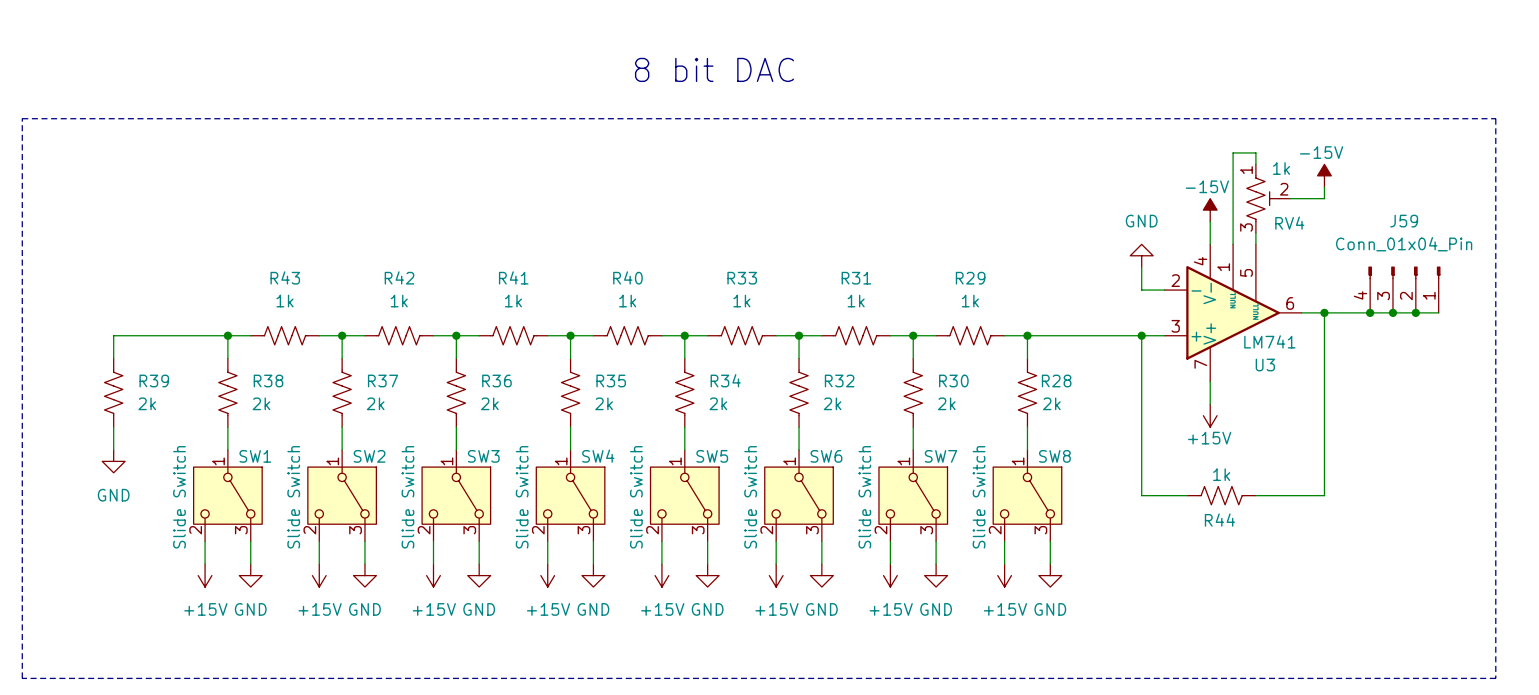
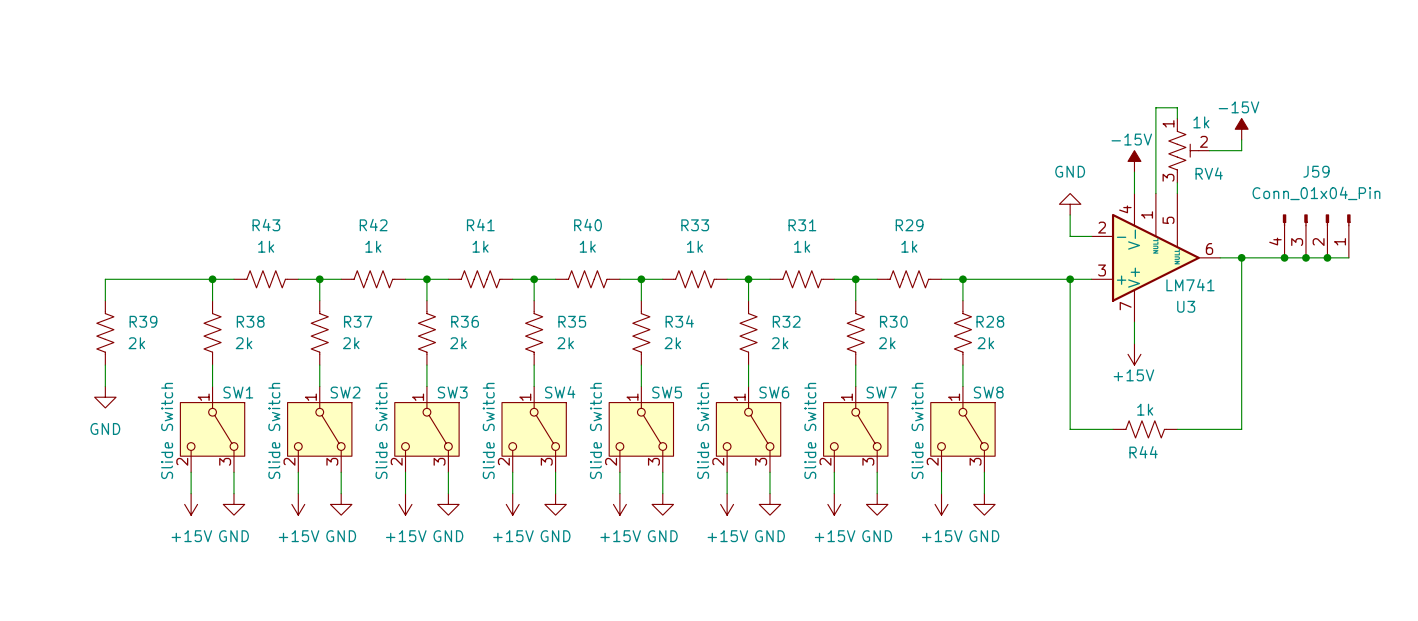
text: 8 bit DAC (714, 69) -> none
line: (22, 118) (1495, 118) (1495, 678) (22, 678) (22, 118) -> none

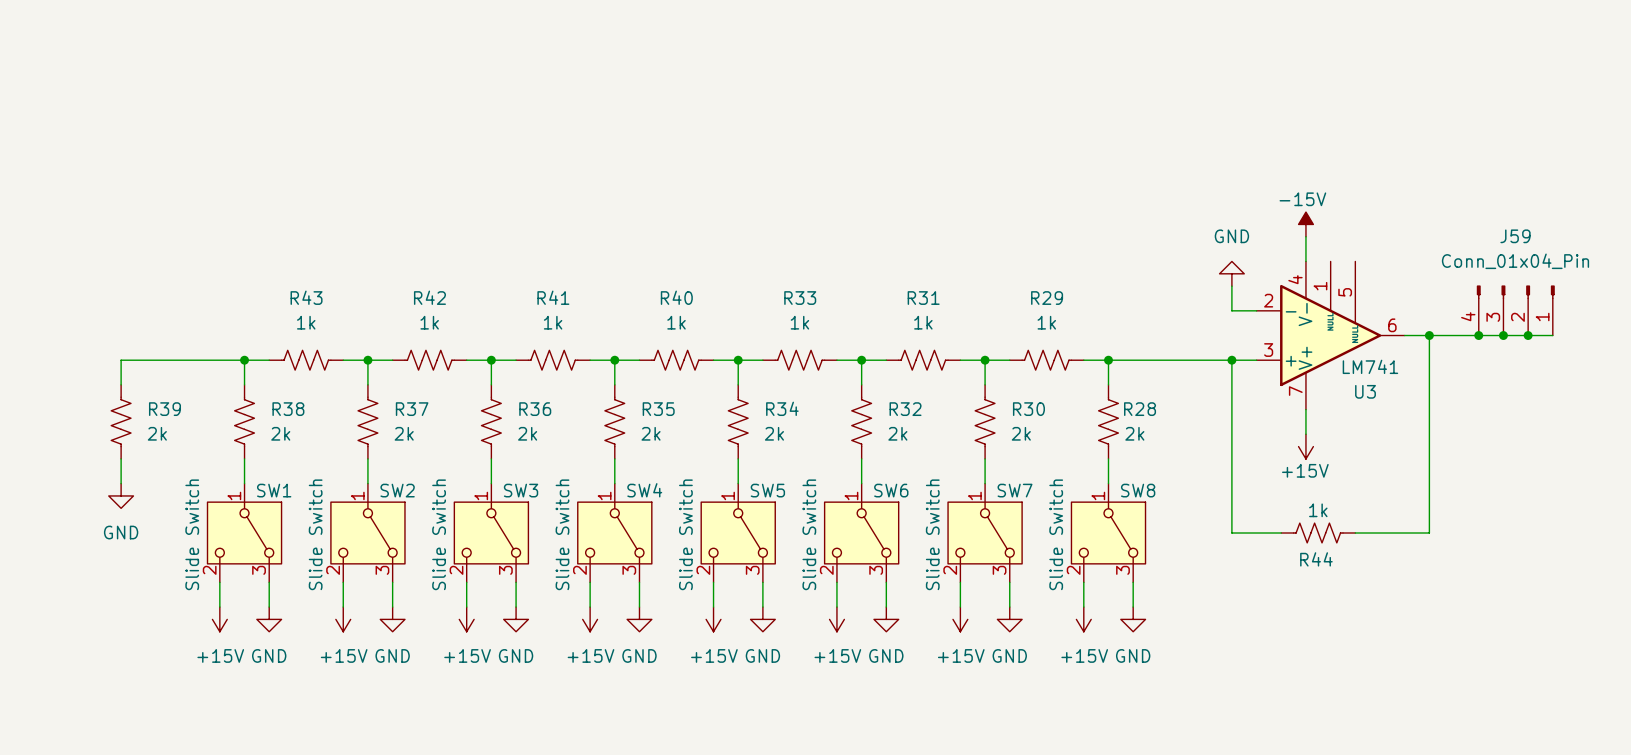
wire: (1177, 118) (1177, 107) (1155, 107) (1155, 193) -> none
power symbol: -15V (1241, 129) -> none
wire: (1241, 139) (1241, 150) (1209, 150) -> none
RV4: 1k (1189, 150) -> none
wire: (1177, 182) (1177, 193) -> none

